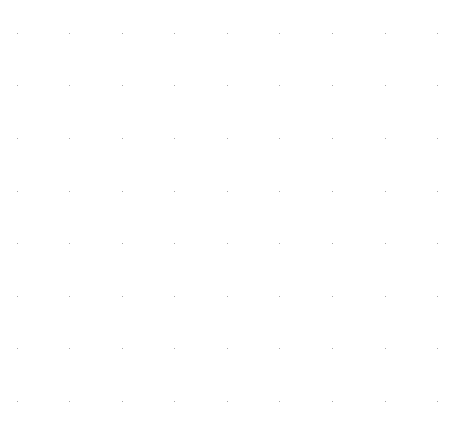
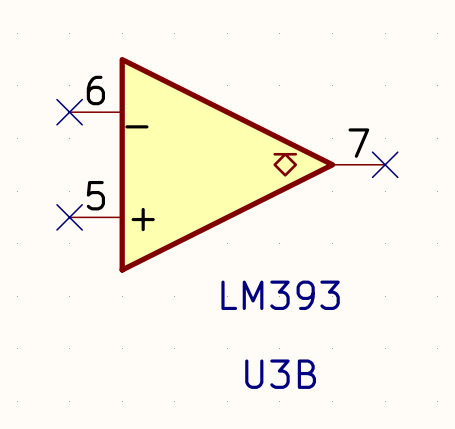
no-connect mark: none -> (69, 112)
U3B: none -> LM393 (227, 164)
no-connect mark: none -> (385, 164)
no-connect mark: none -> (69, 217)

